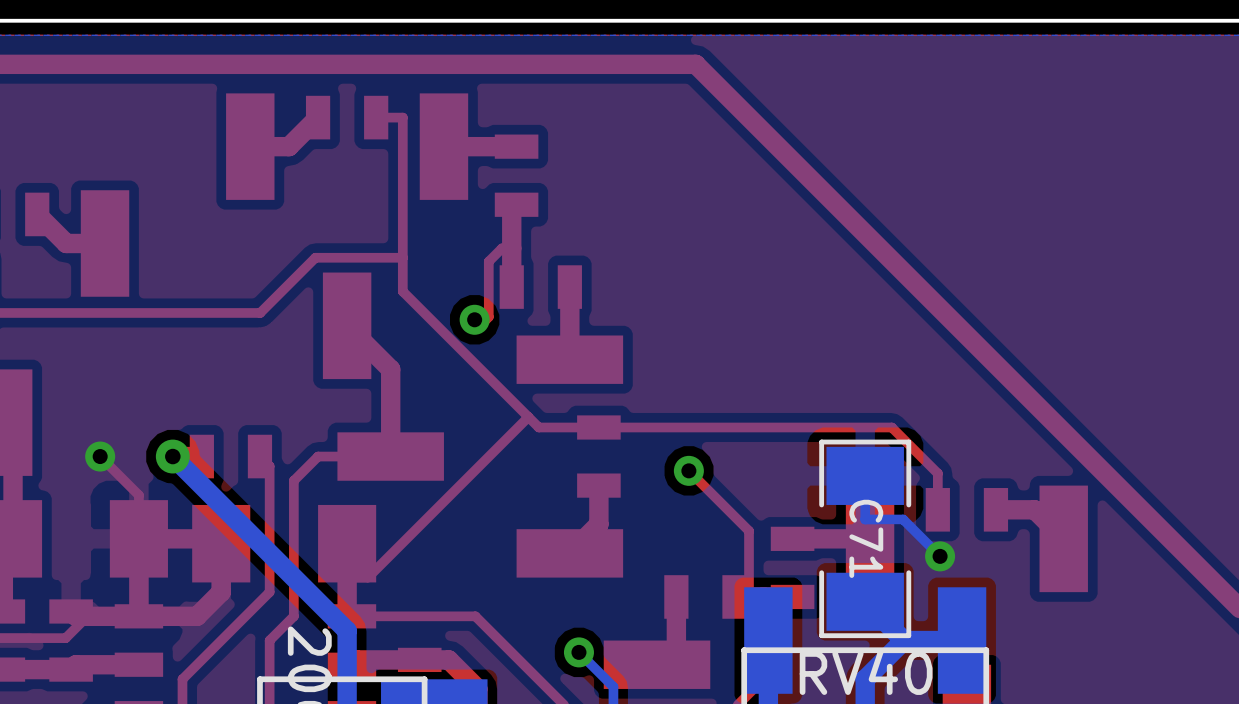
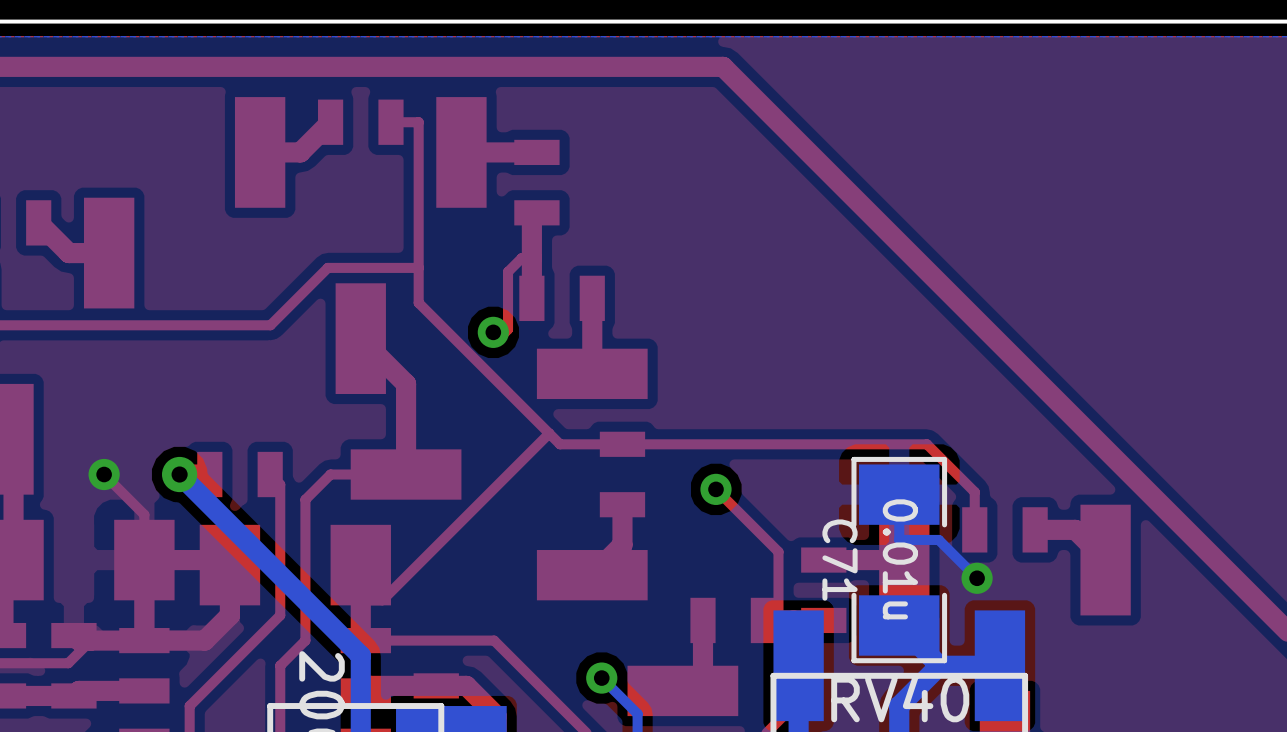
C71 name position: C71 (866, 538) -> C71 (840, 560)
C71 value: none -> 0.01u (900, 559)

